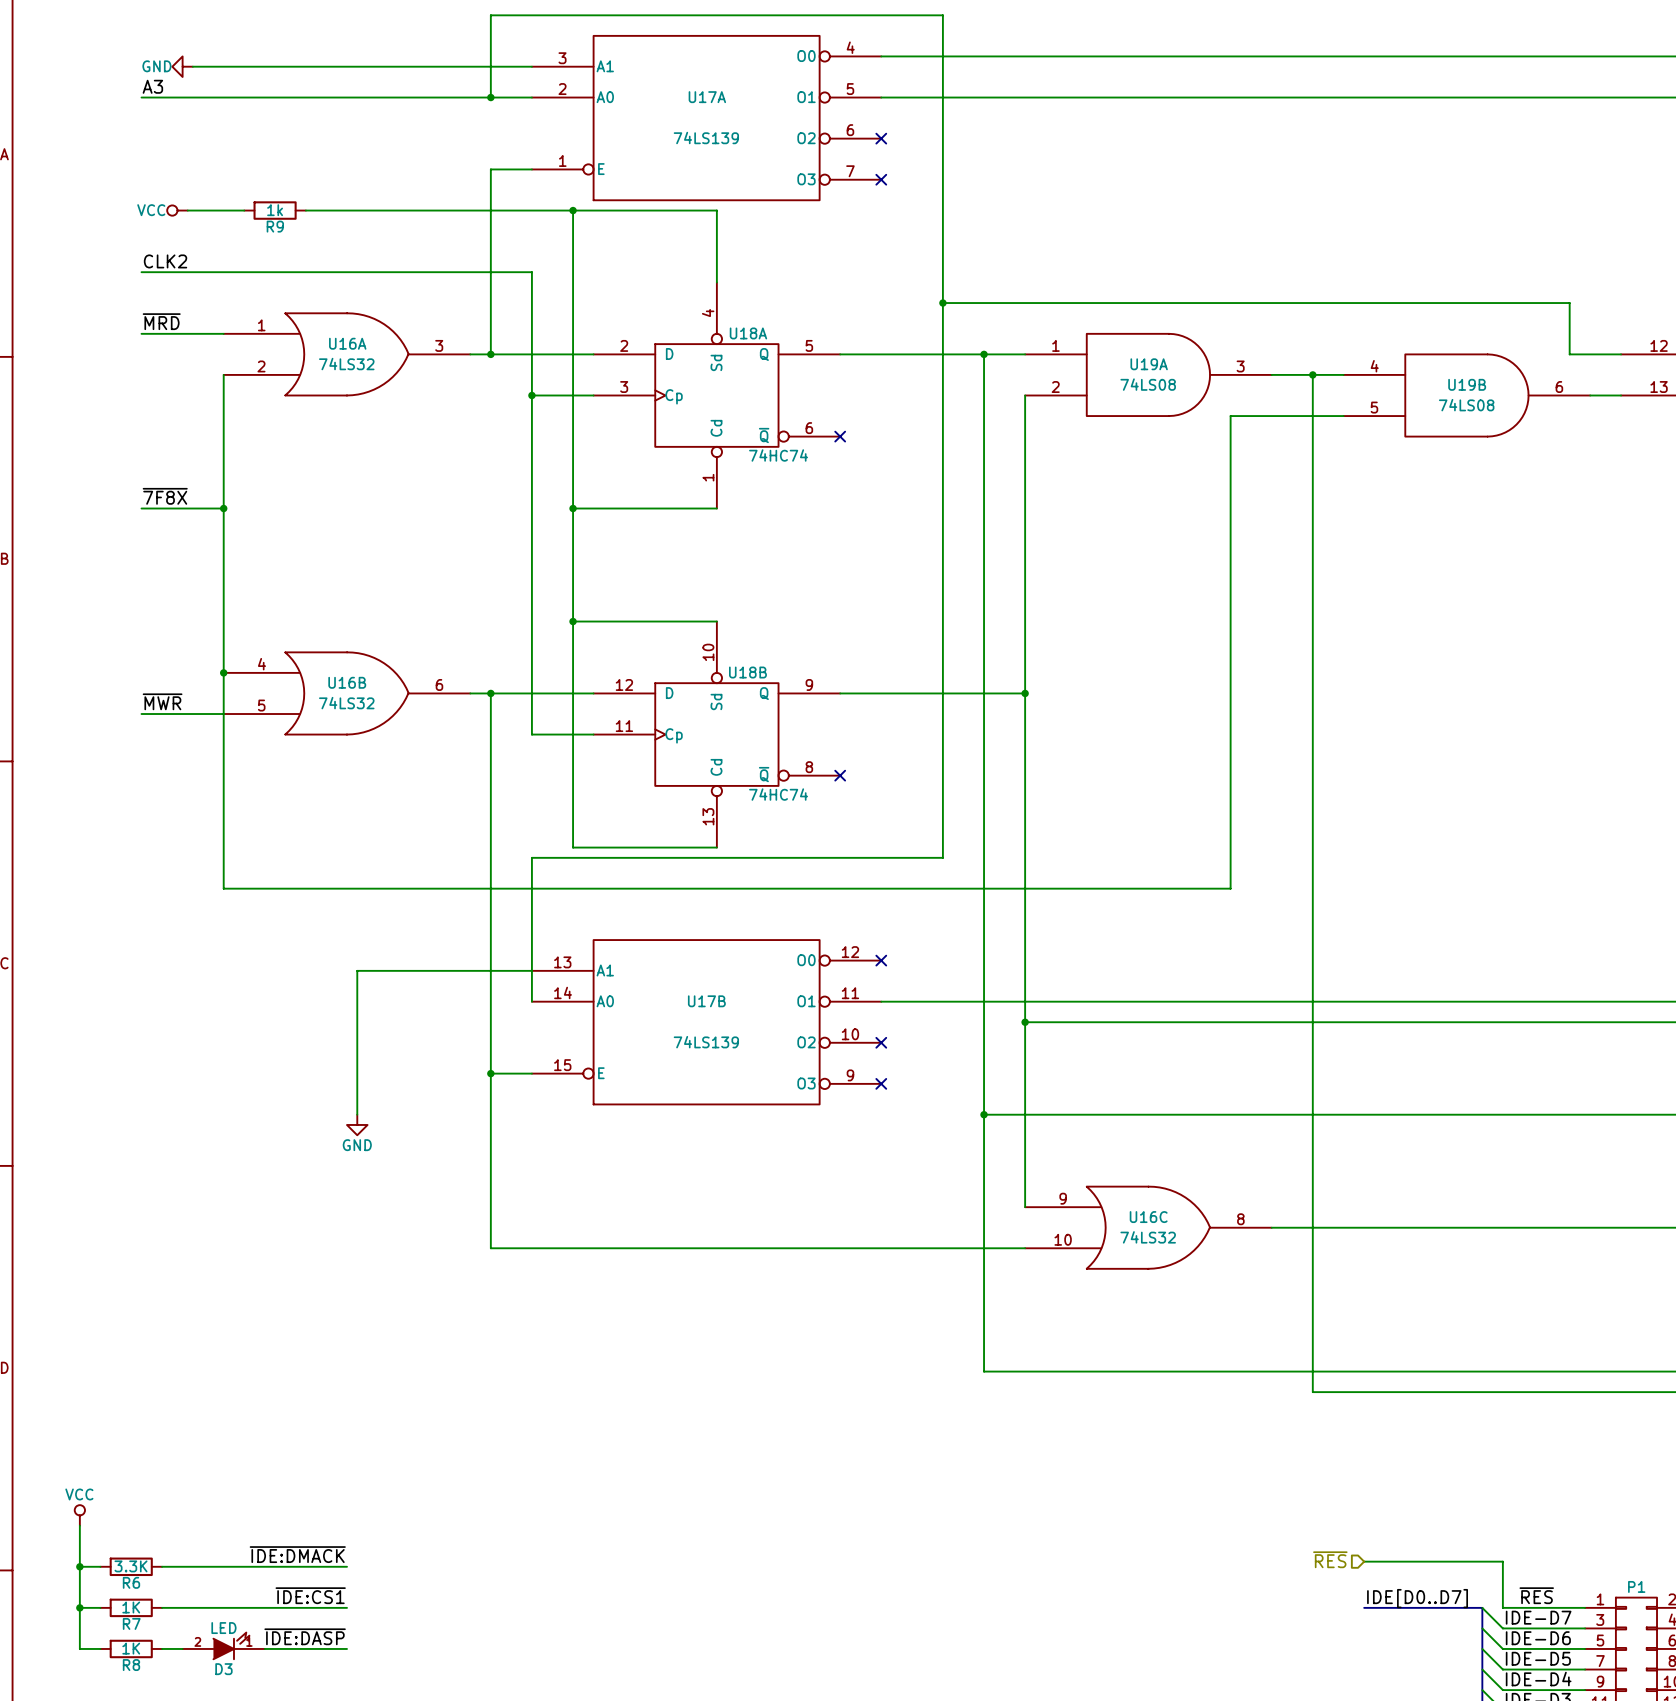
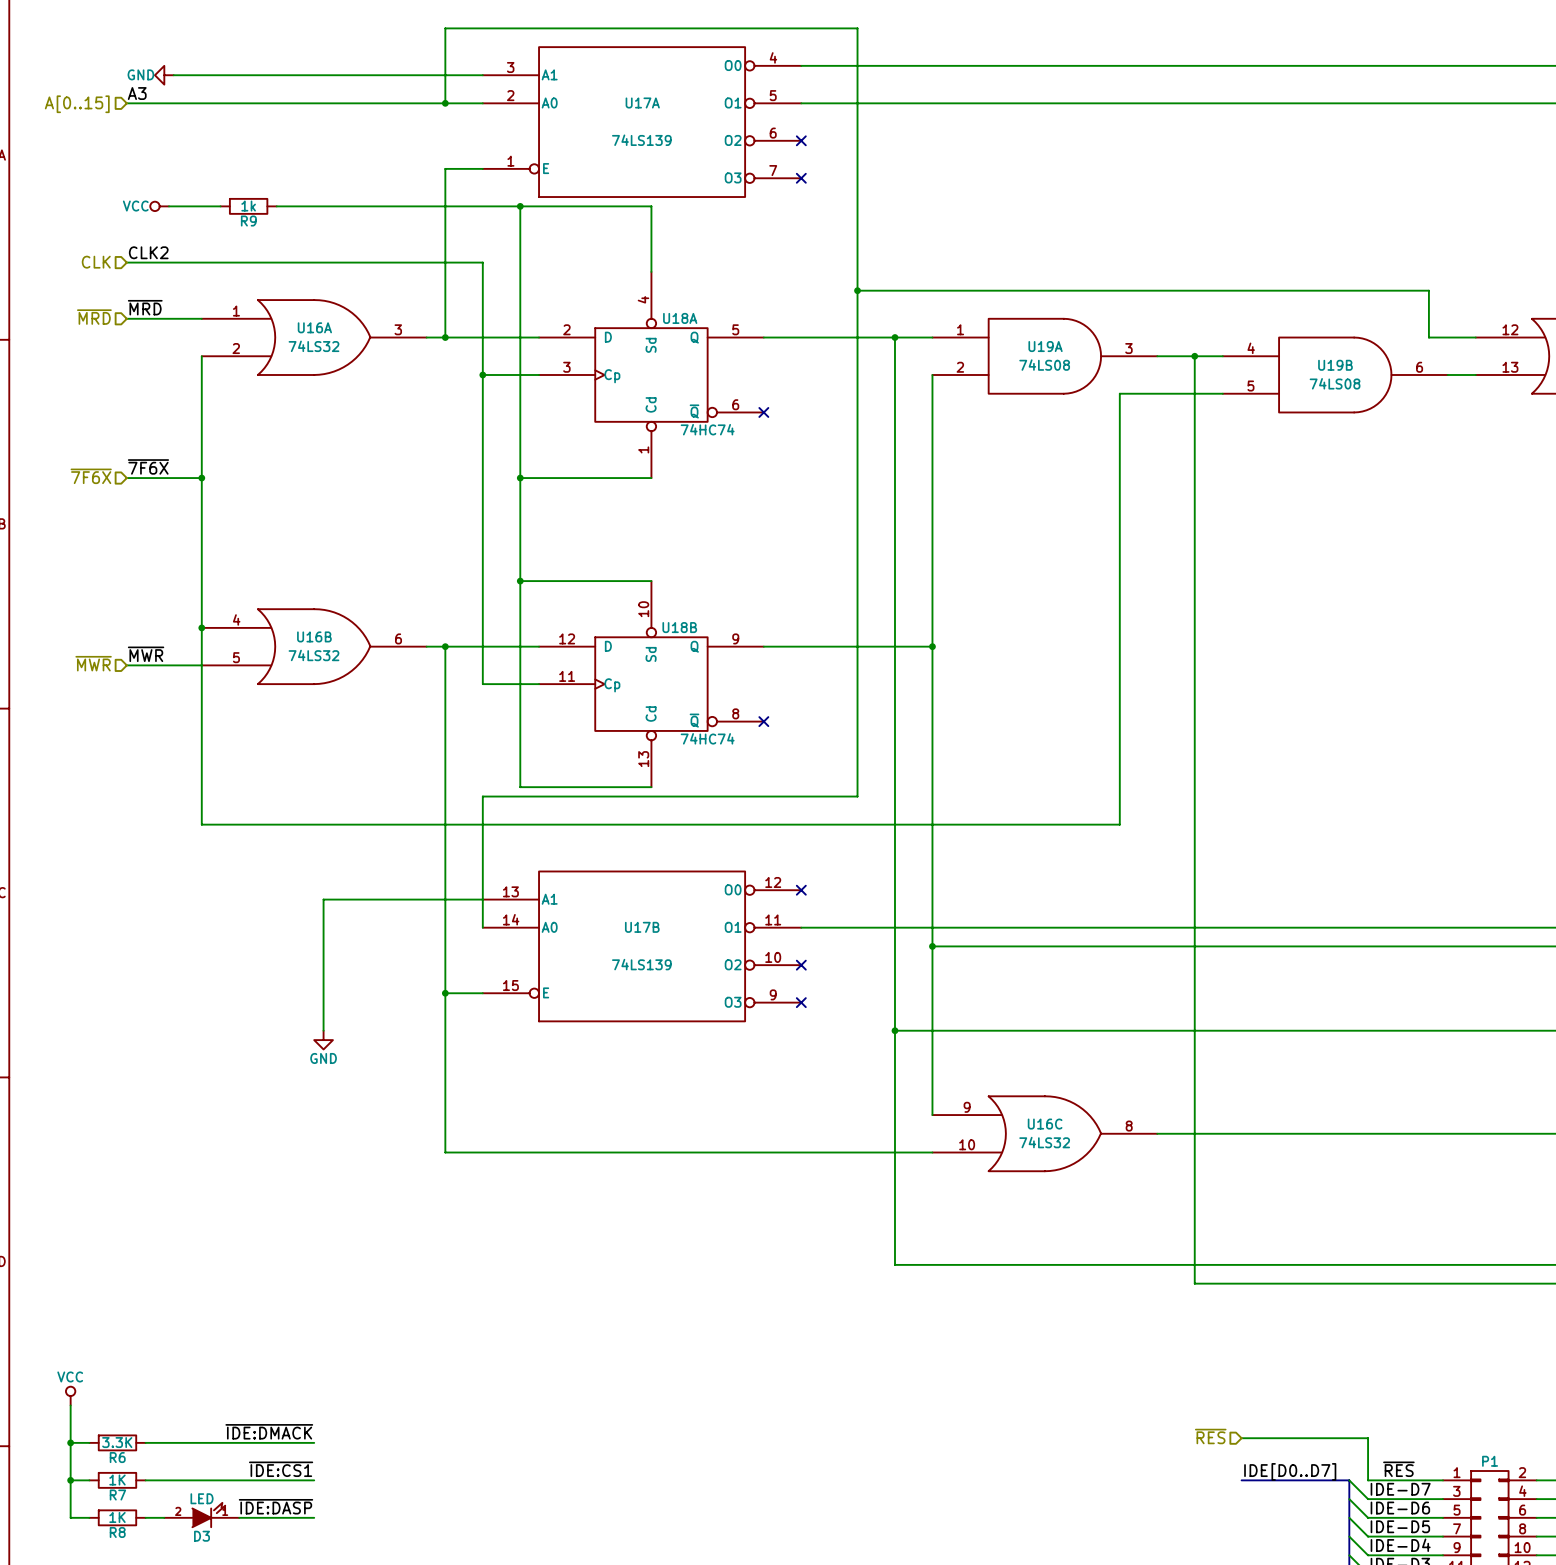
hierarchical label: none -> A[0..15] (77, 104)
hierarchical label: none -> CLK (96, 262)
hierarchical label: none -> ~{MRD} (94, 317)
label: ~{7F8X} (165, 496) -> ~{7F6X} (148, 466)
hierarchical label: none -> ~{7F6X} (91, 476)
hierarchical label: none -> ~{MWR} (93, 663)

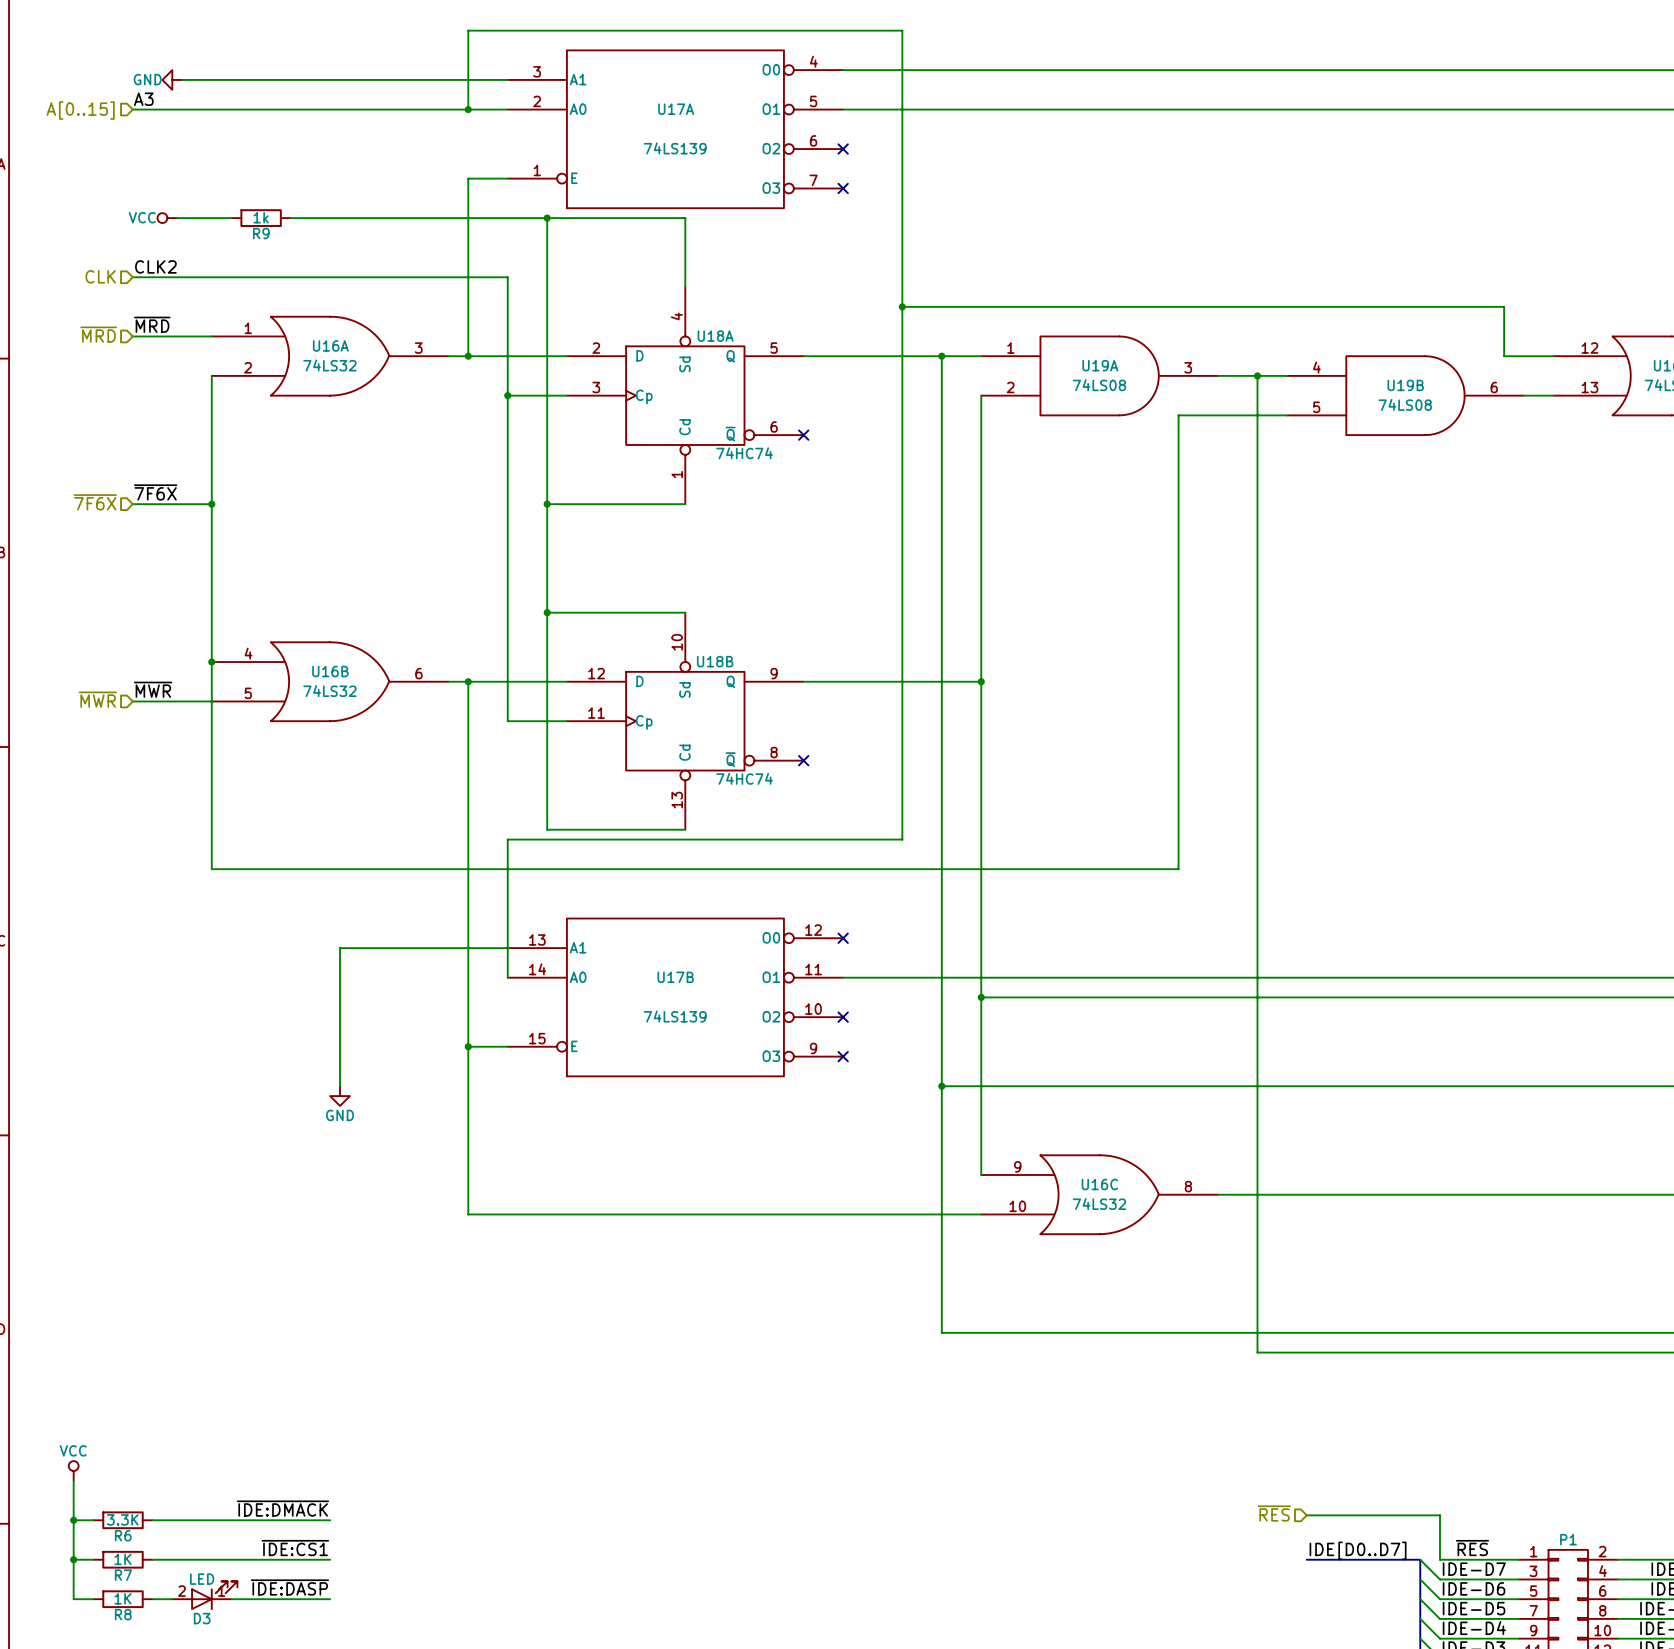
D3 symbol: [164, 1502, 240, 1528] -> [172, 1581, 238, 1610]

